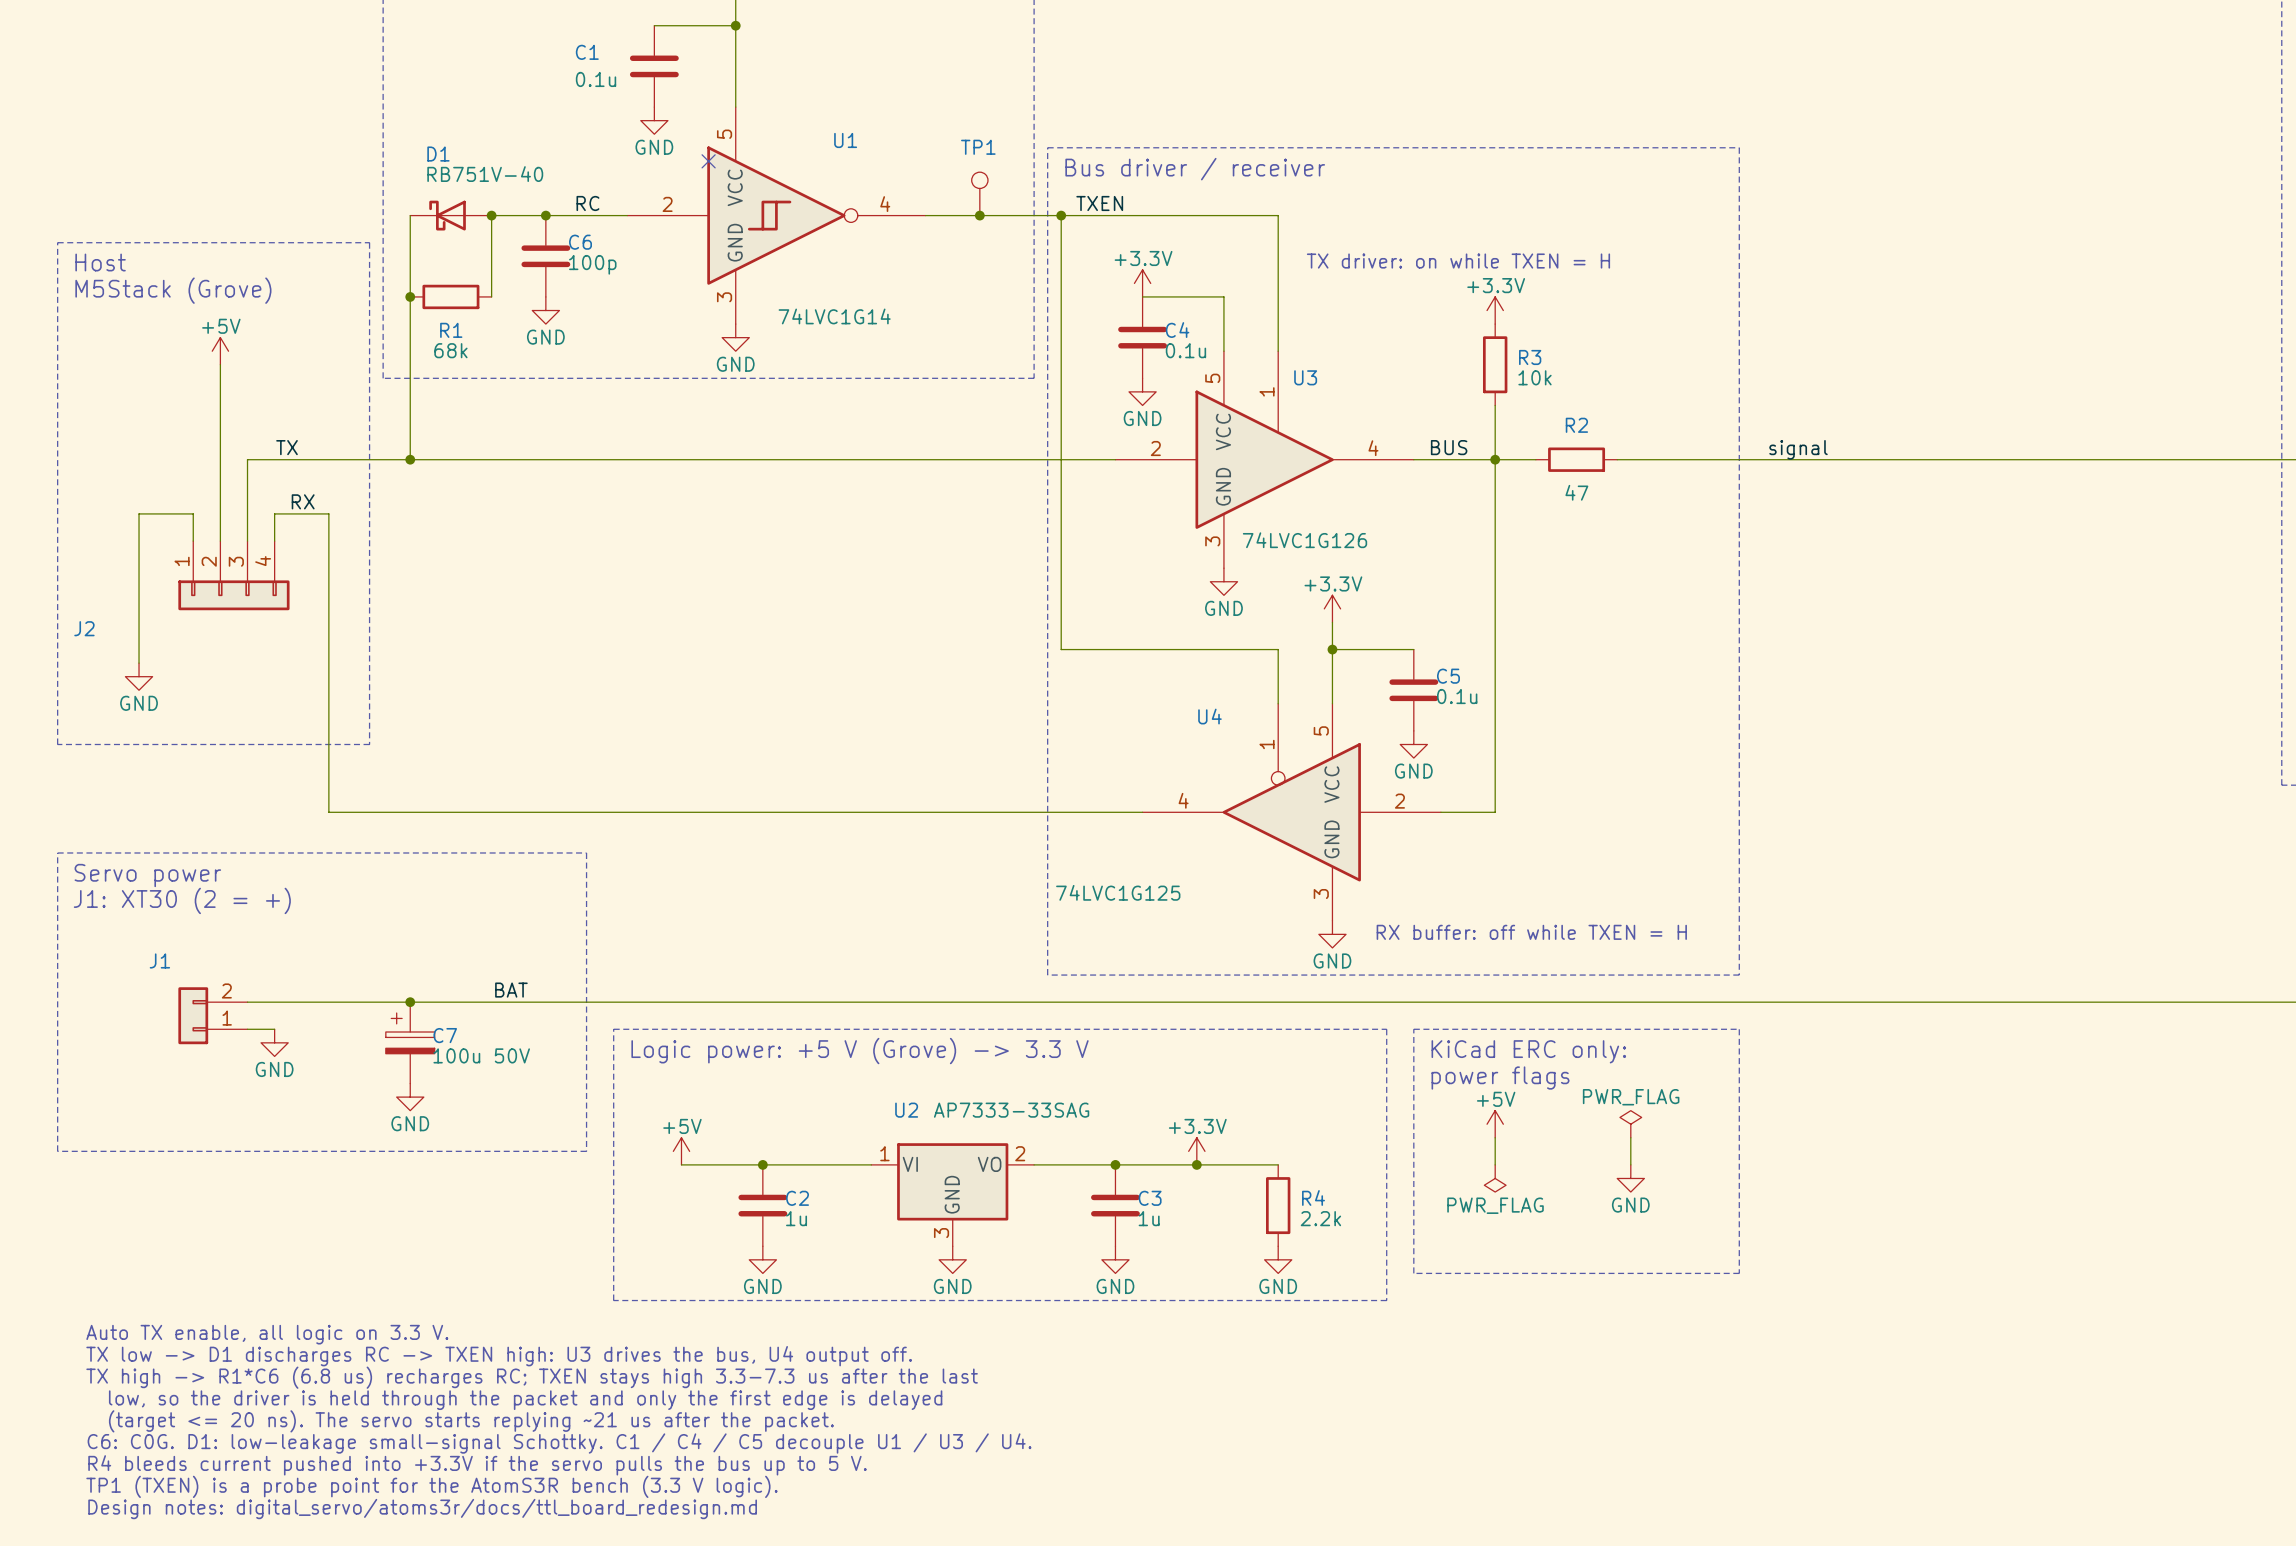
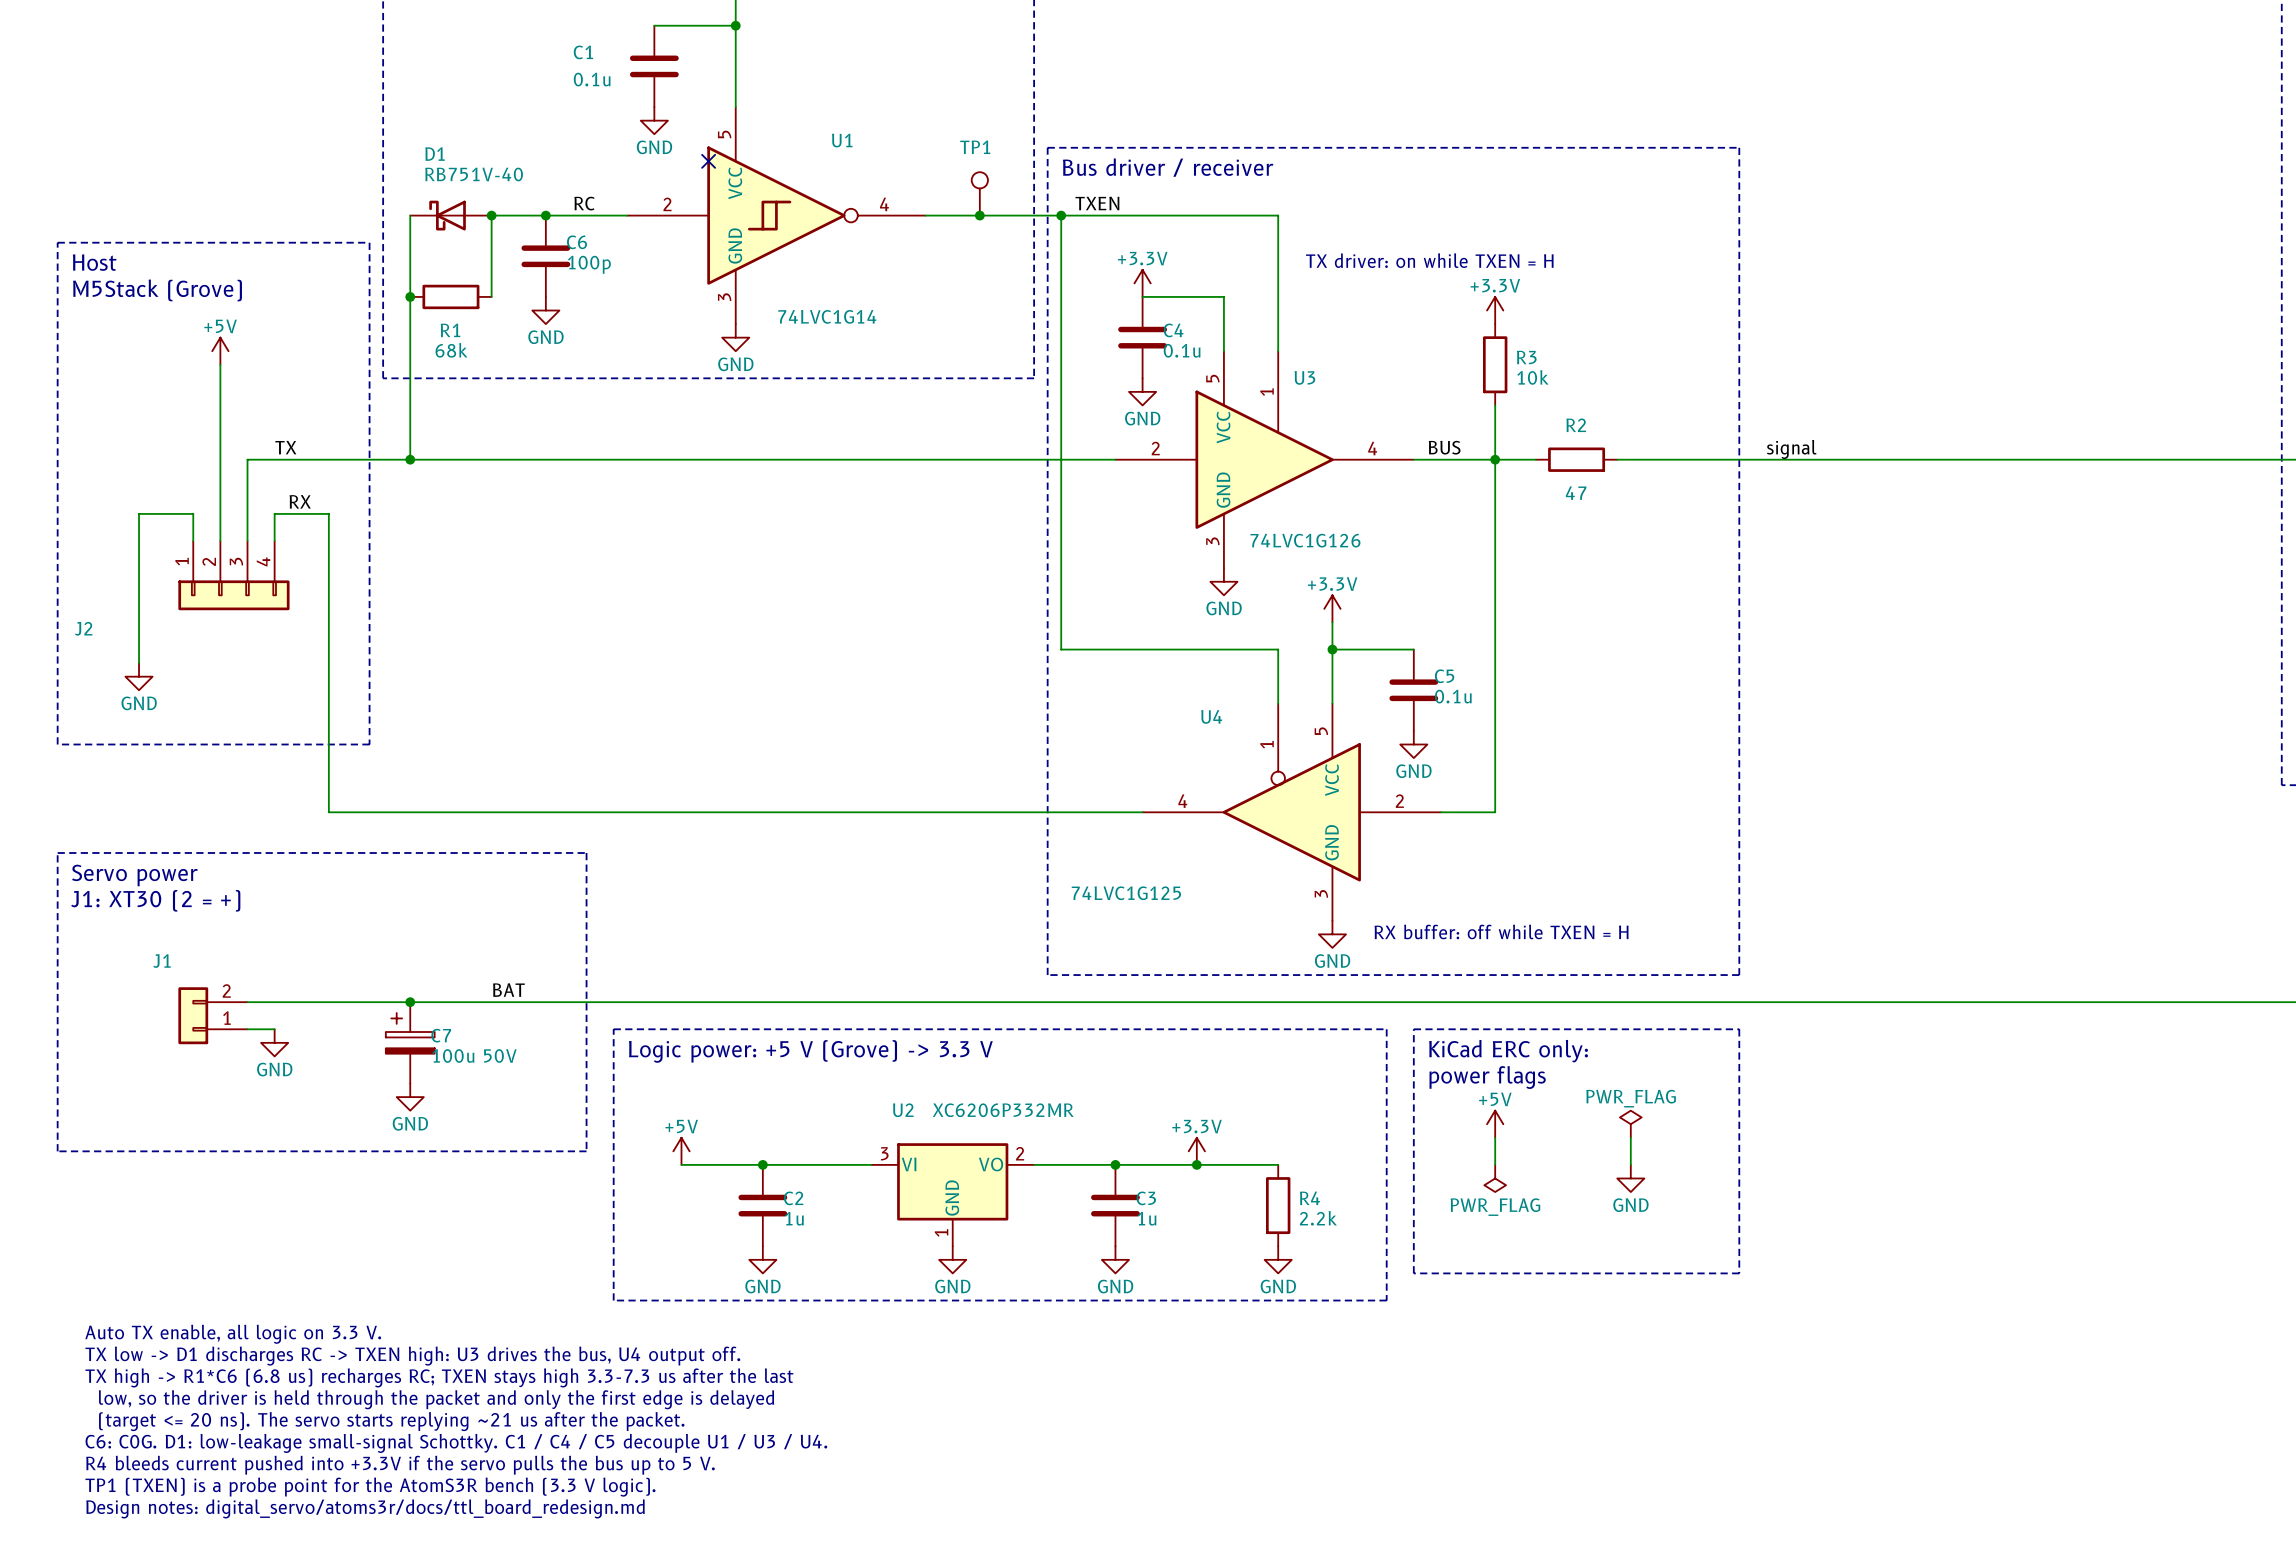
U2 value: AP7333-33SAG (1011, 1110) -> XC6206P332MR (1003, 1110)
U2 pin number: 1 (884, 1153) -> 3 (884, 1153)
U2 pin number: 3 (941, 1233) -> 1 (941, 1232)

